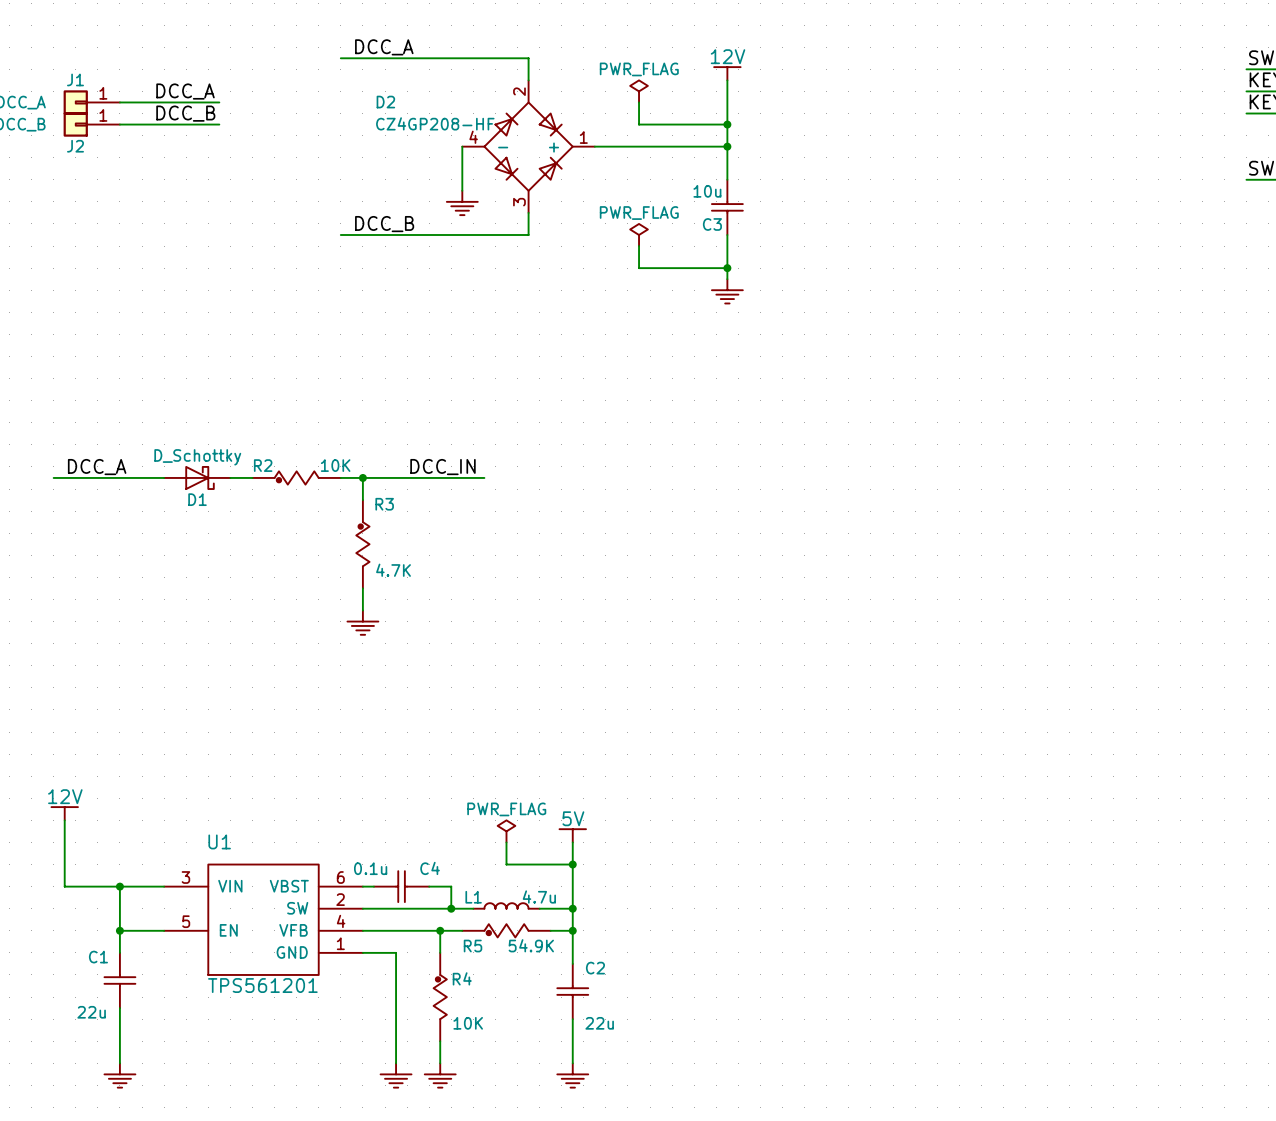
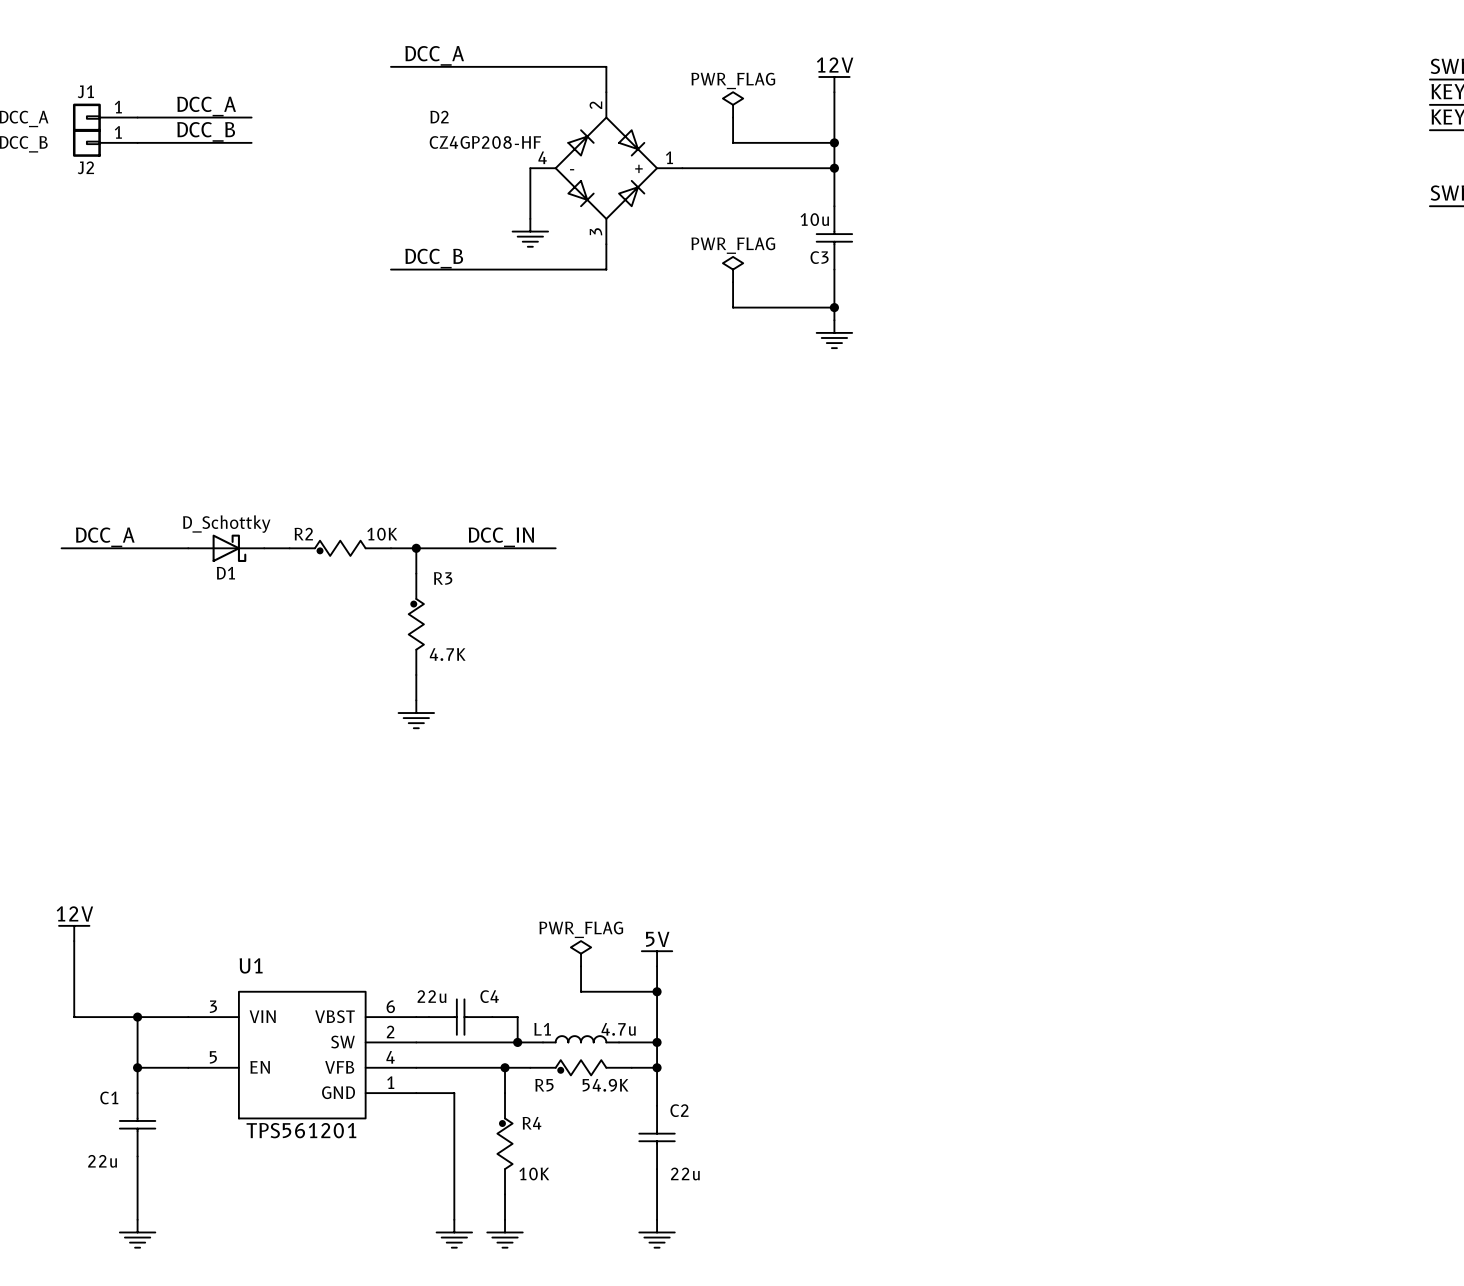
C4 value: 0.1u (370, 868) -> 22u (431, 996)

